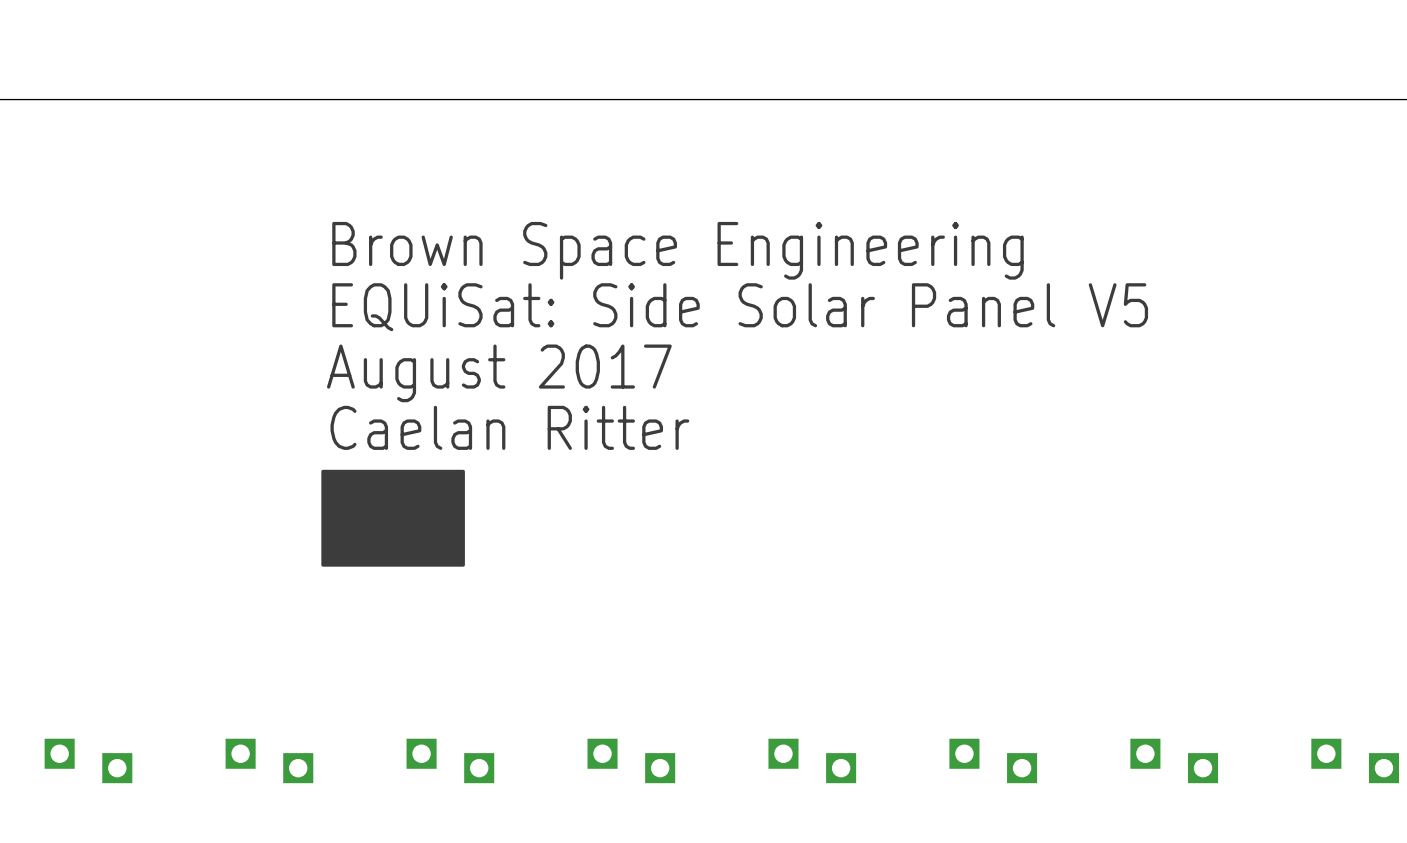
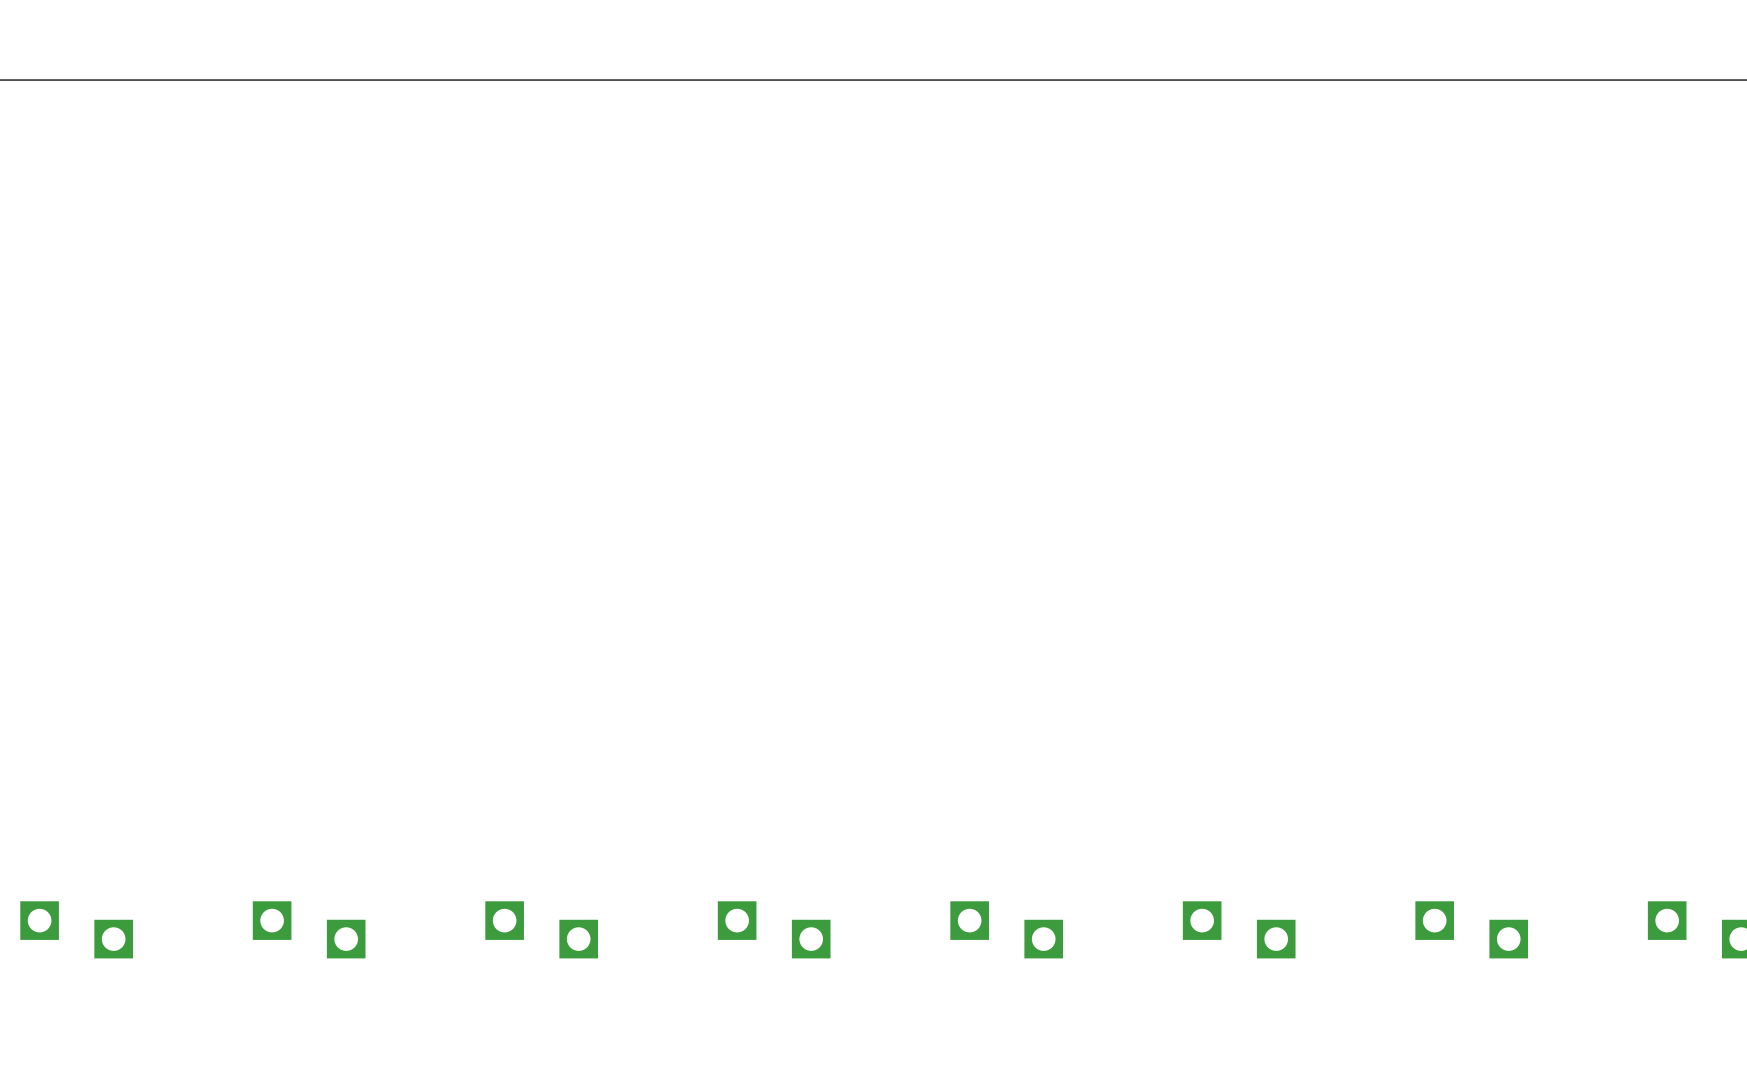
text: Brown Space Engineering (677, 250) -> none
text: EQUiSat: Side Solar Panel V5 (740, 307) -> none
text: August 2017 (499, 373) -> none
text: Caelan Ritter (509, 427) -> none
drawing: [321, 469, 465, 567] -> none

